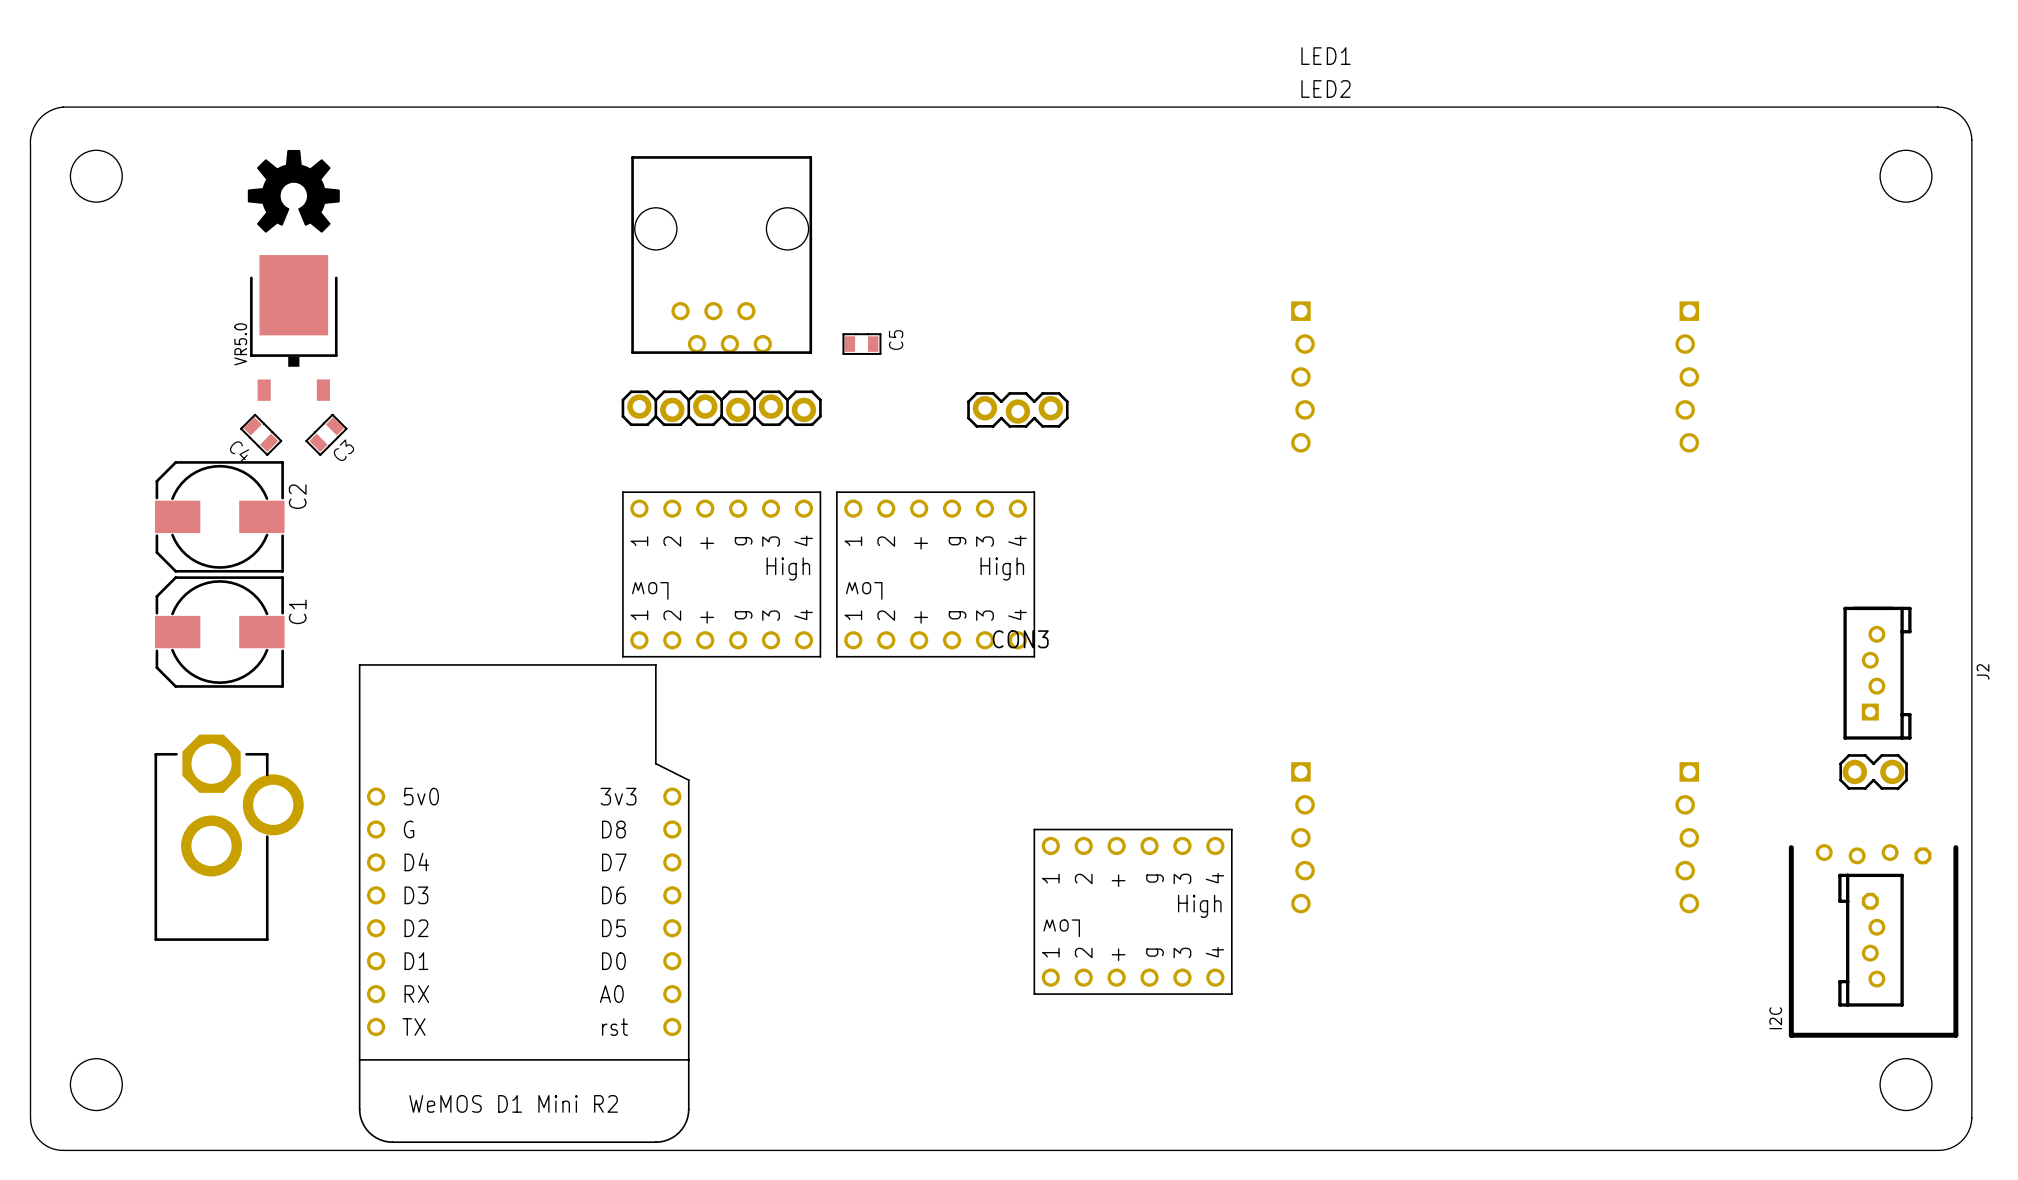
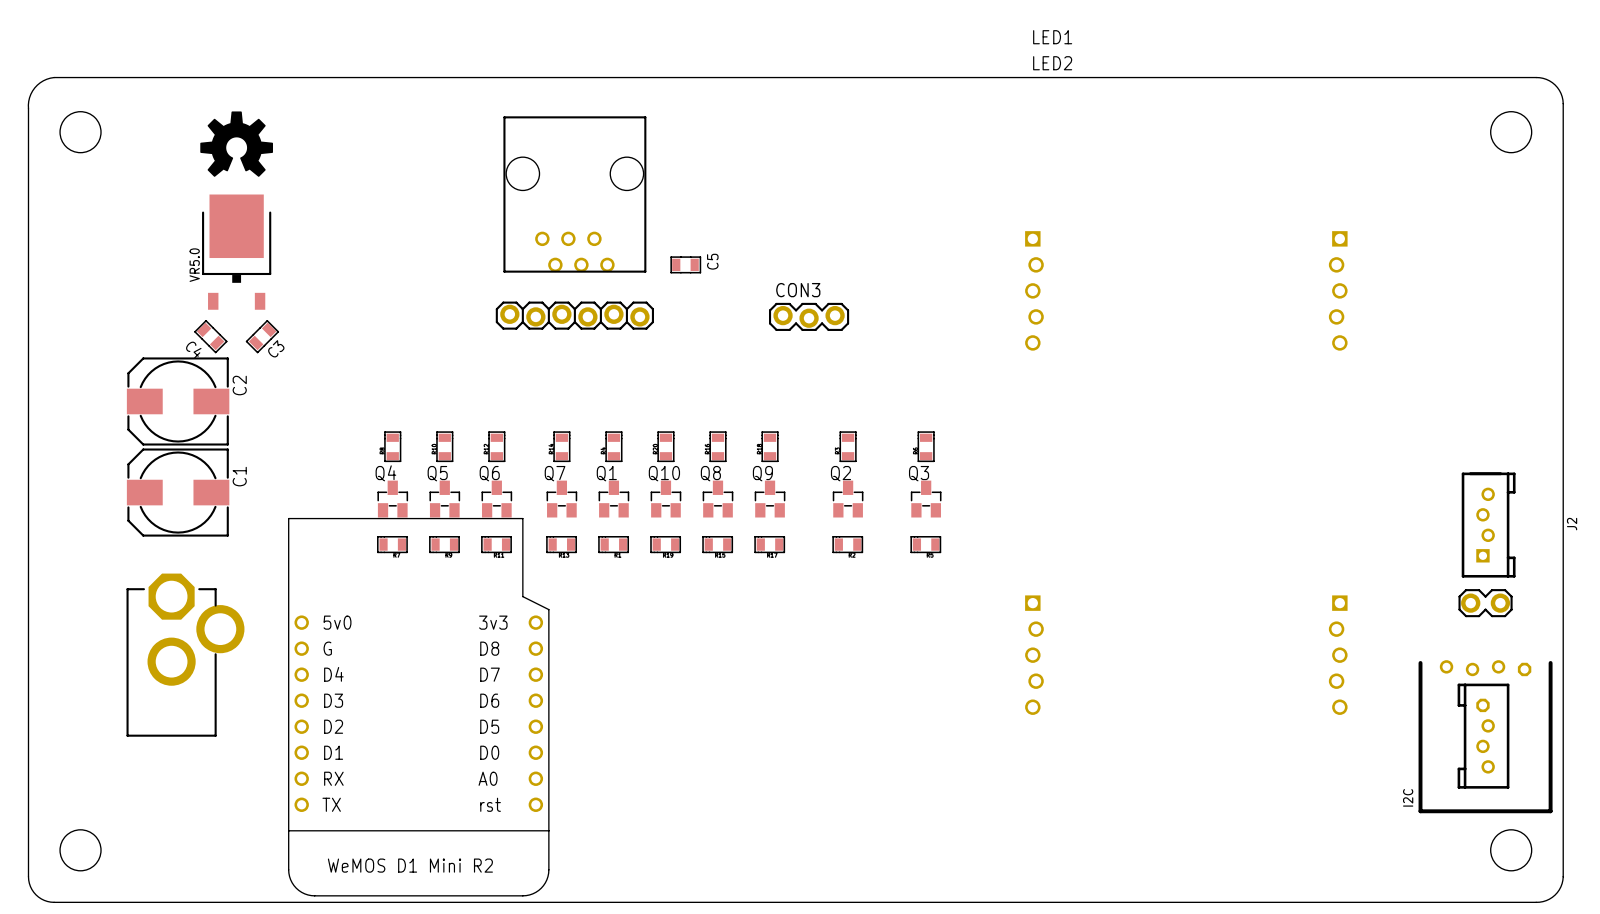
part: none -> (392, 446)
part: none -> (444, 446)
part: none -> (496, 446)
part: none -> (561, 446)
part: (721, 574) -> none
part: none -> (613, 446)
part: none -> (665, 446)
part: none -> (717, 446)
part: (935, 574) -> none
part: none -> (770, 446)
part: none -> (848, 446)
part: none -> (926, 446)
CON3 name position: CON3 (1020, 639) -> CON3 (798, 290)
Q4: none -> (392, 499)
Q5: none -> (444, 499)
Q6: none -> (496, 499)
Q7: none -> (561, 499)
Q1: none -> (613, 499)
Q10: none -> (665, 499)
Q8: none -> (717, 499)
Q9: none -> (770, 499)
Q2: none -> (848, 499)
Q3: none -> (926, 499)
part: none -> (392, 544)
part: none -> (444, 544)
part: none -> (496, 544)
part: none -> (561, 544)
part: none -> (613, 544)
part: none -> (665, 544)
part: none -> (717, 544)
part: none -> (769, 544)
part: none -> (847, 544)
part: none -> (925, 544)
part: (1133, 911) -> none

